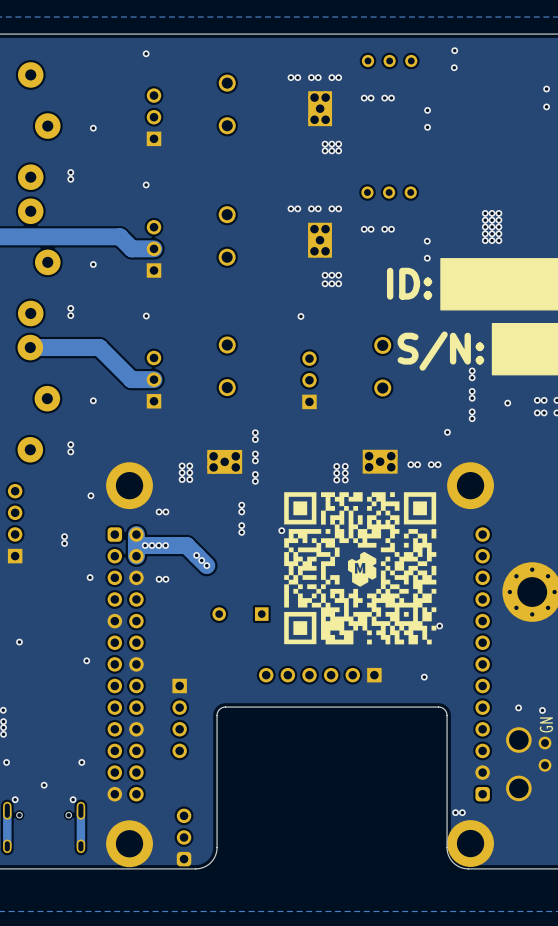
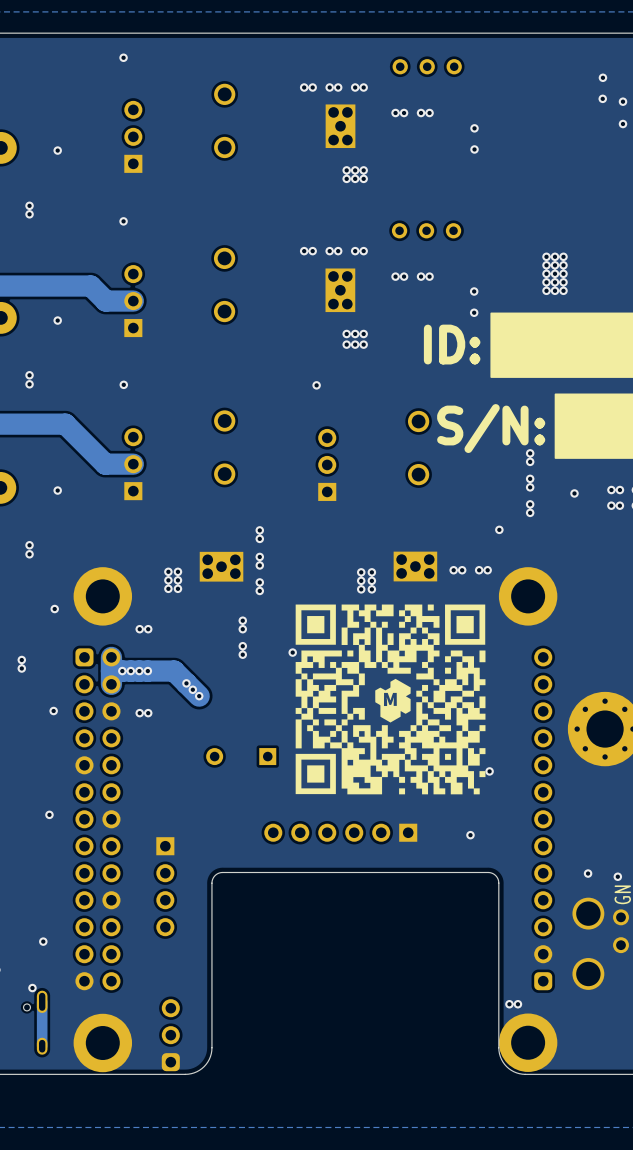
via: (454, 50) -> none
via: (454, 67) -> none
via: none -> (602, 77)
via: none -> (602, 98)

